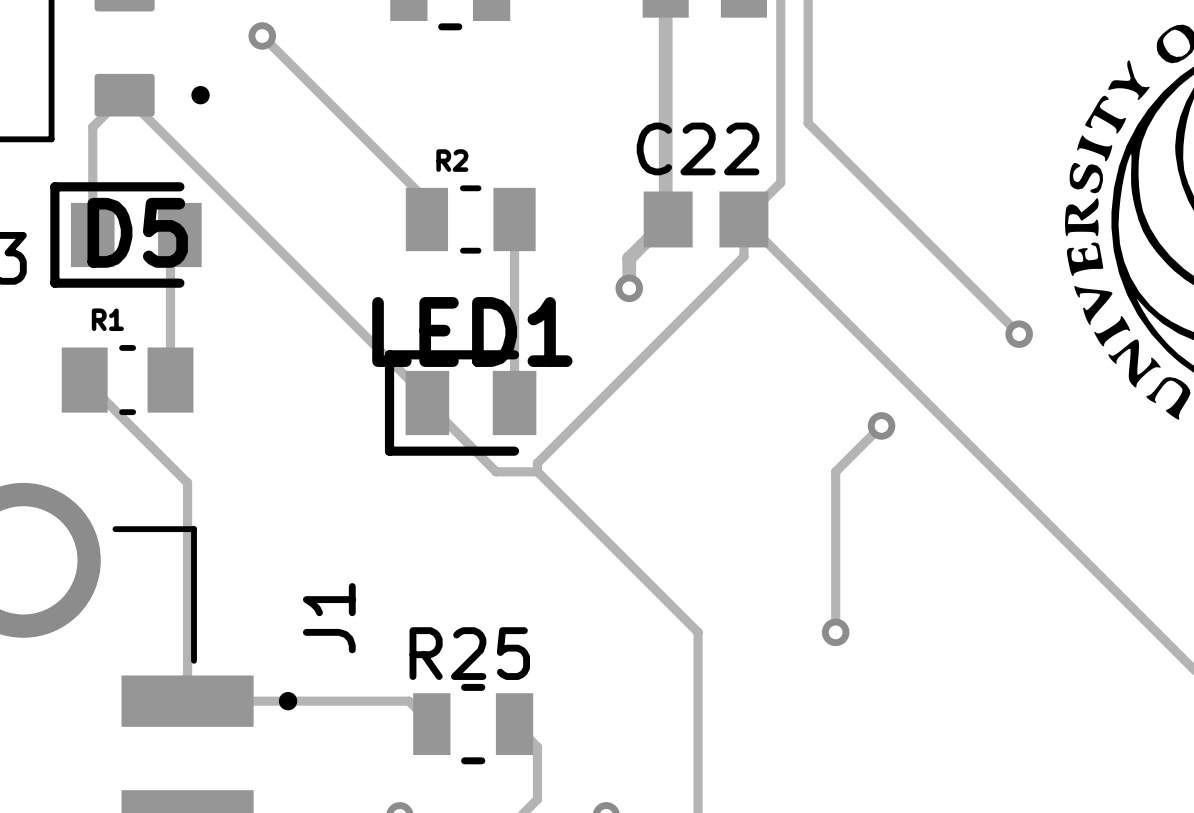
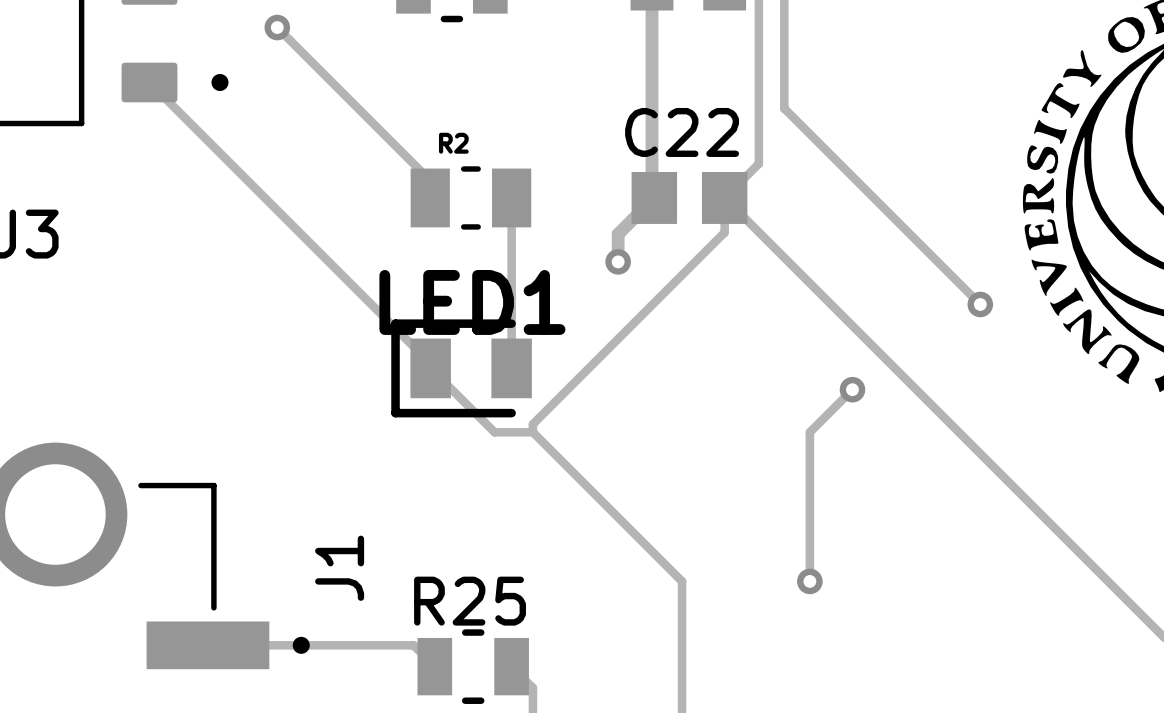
track: (124, 95) (92, 127) (92, 234) -> none
D5: (125, 234) -> none
track: (179, 234) (170, 244) (170, 380) -> none
track: (84, 380) (187, 482) (187, 701) -> none
R1: (127, 380) -> none

